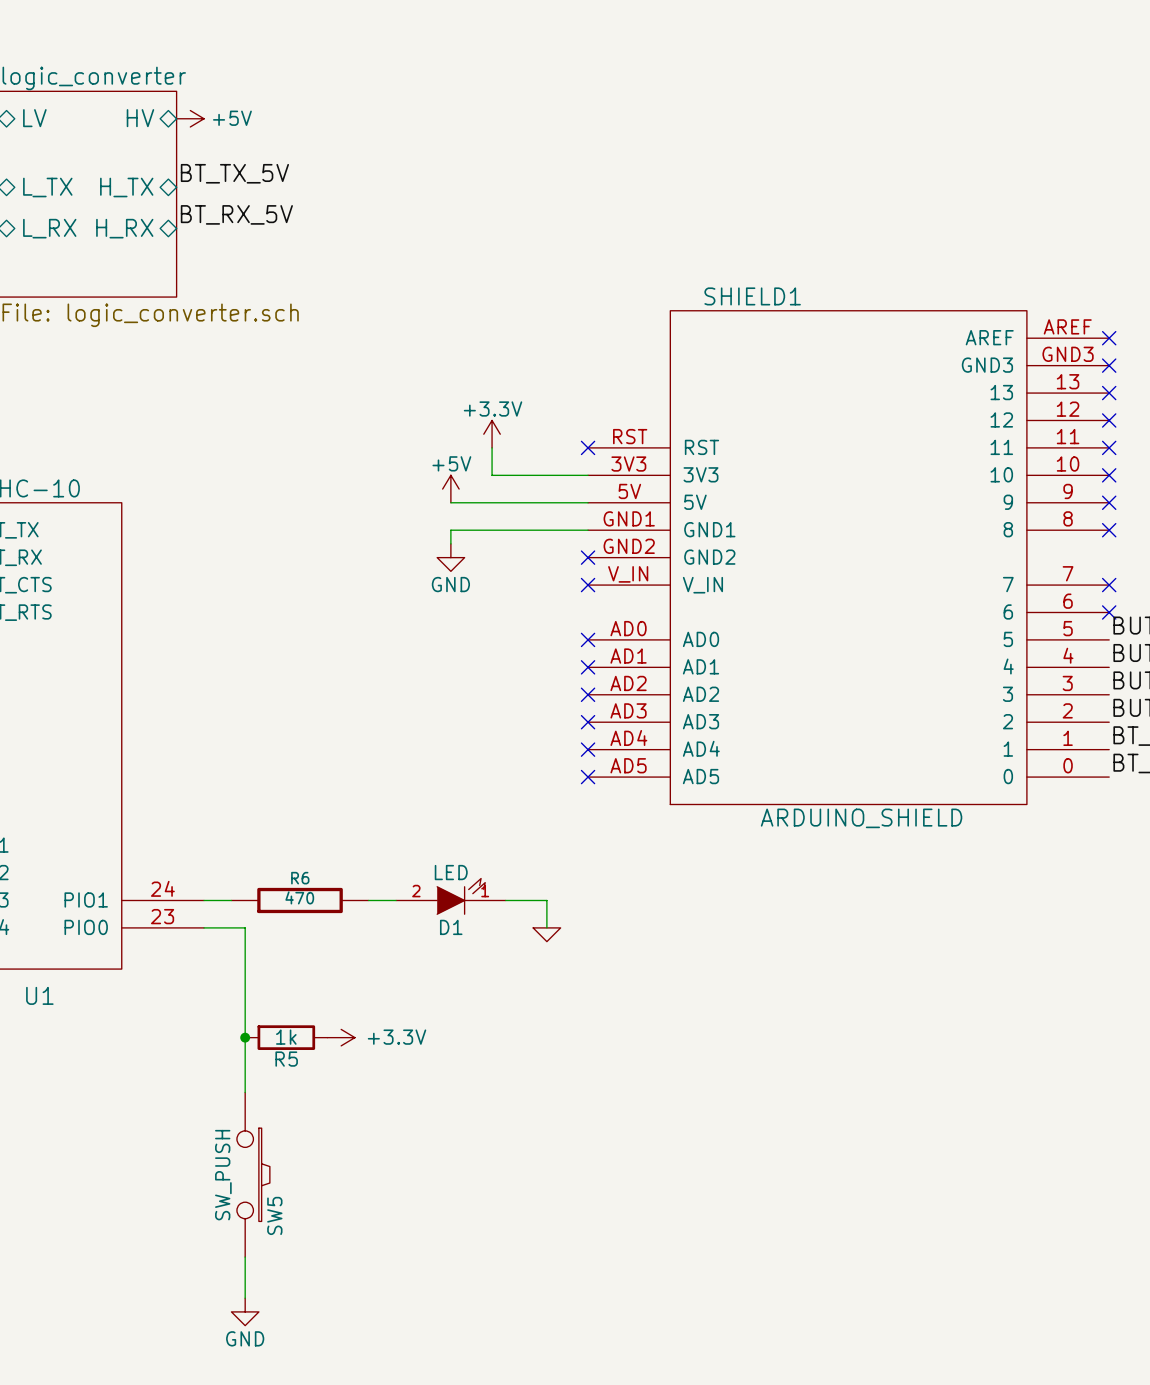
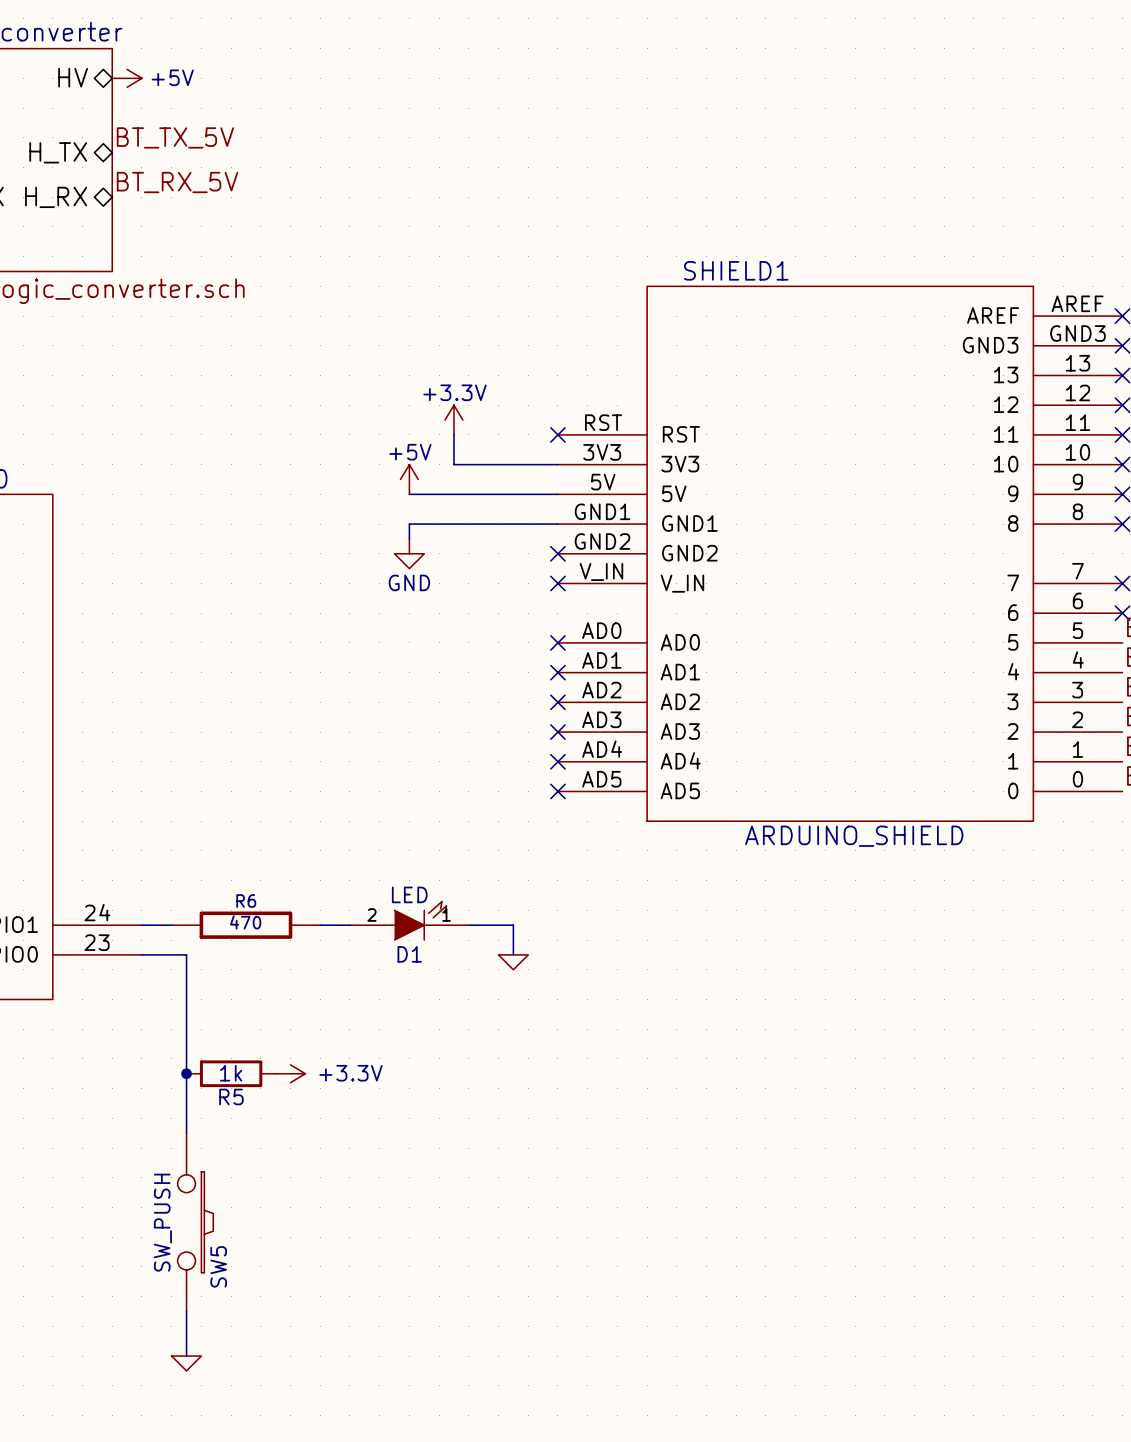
power symbol shape: [231, 1298, 259, 1326] -> [171, 1356, 202, 1371]
power symbol text: GND (245, 1338) -> none

